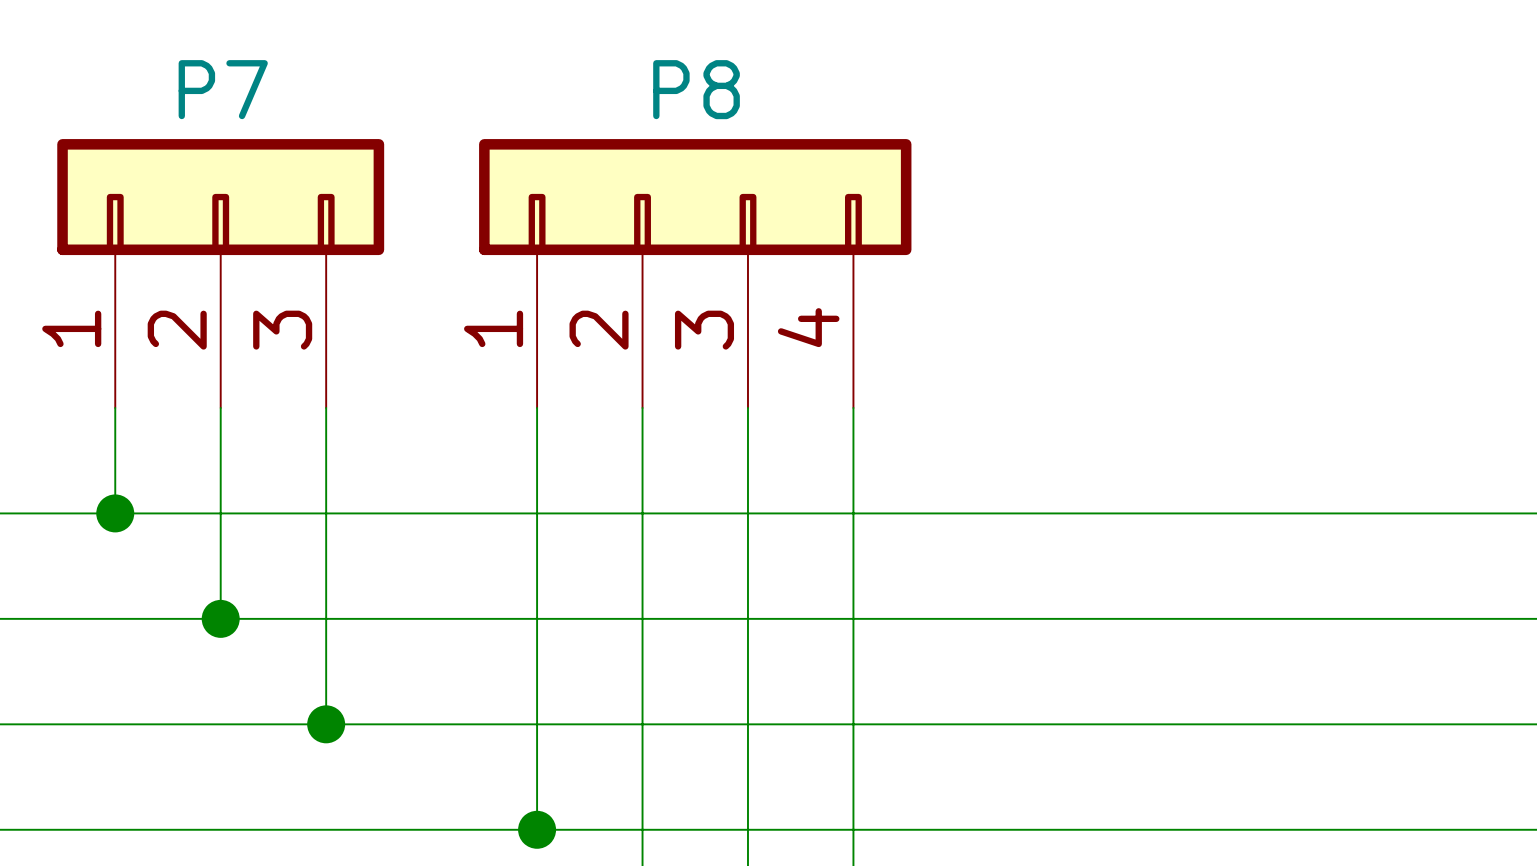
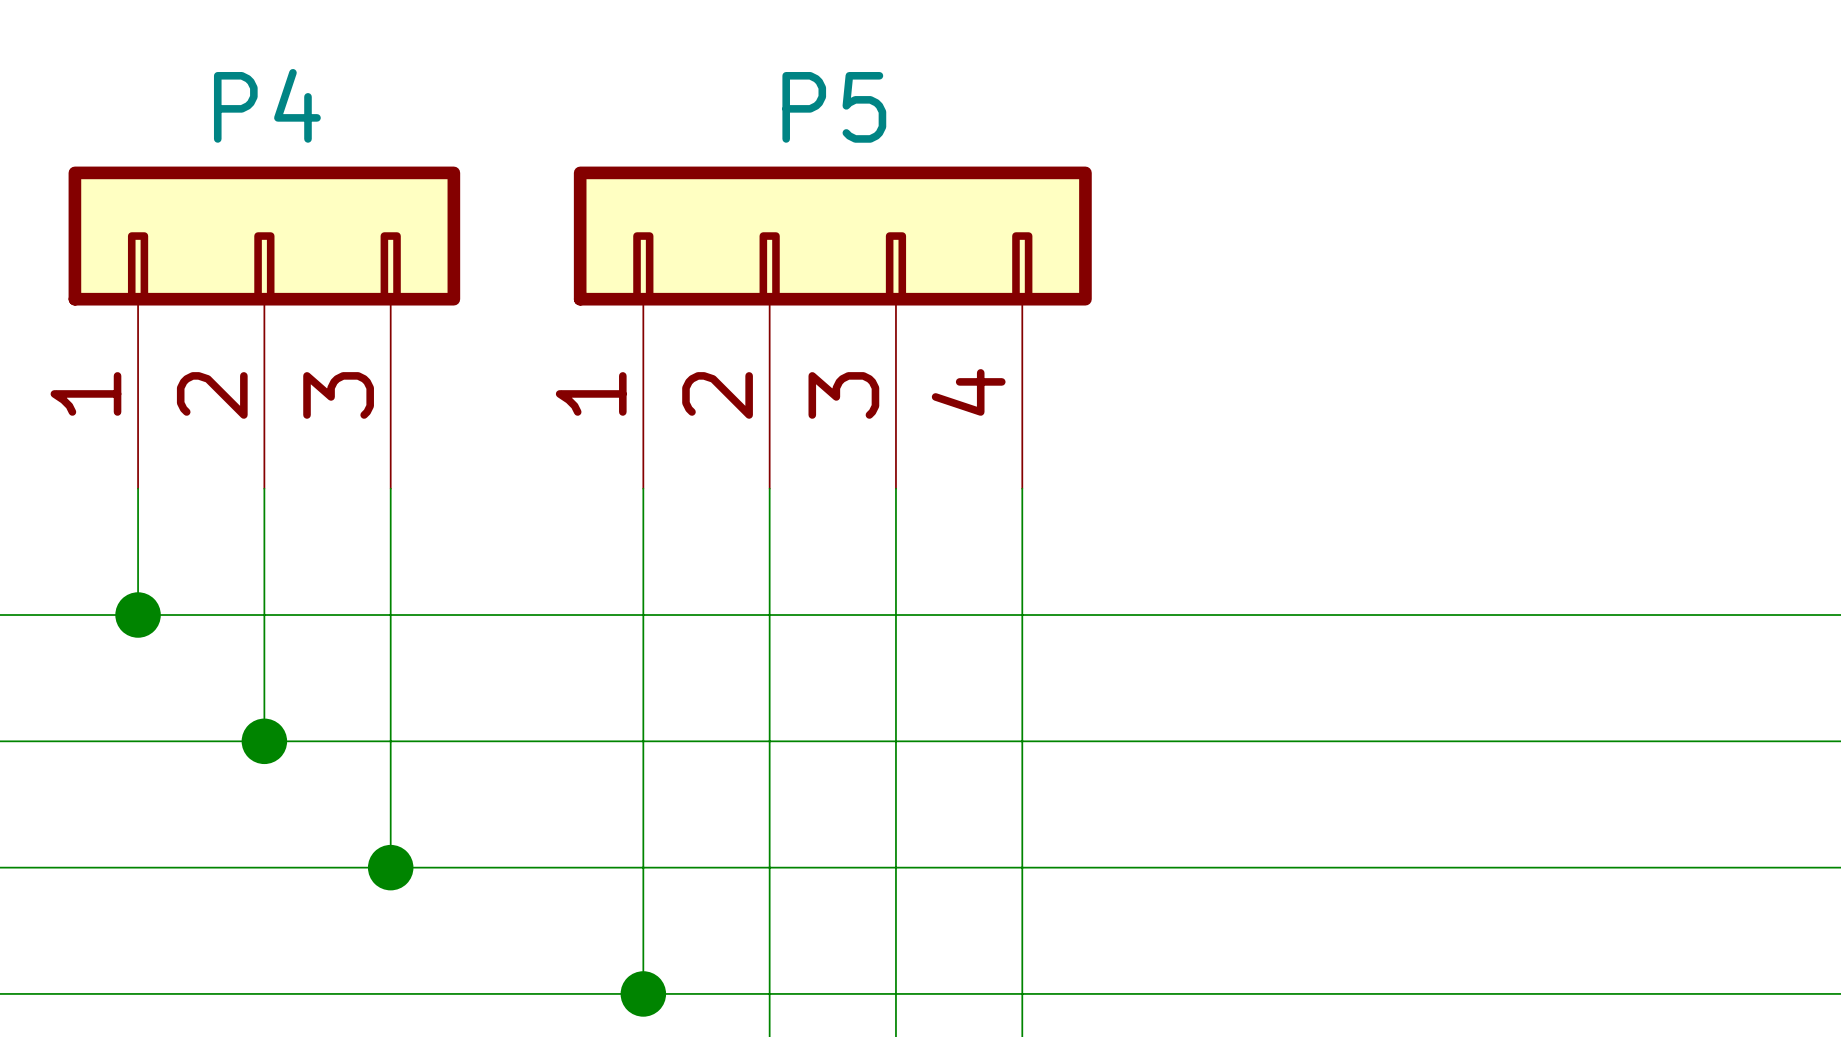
P7 name: P7 (223, 89) -> P4 (267, 105)
P8 name: P8 (696, 89) -> P5 (834, 107)

